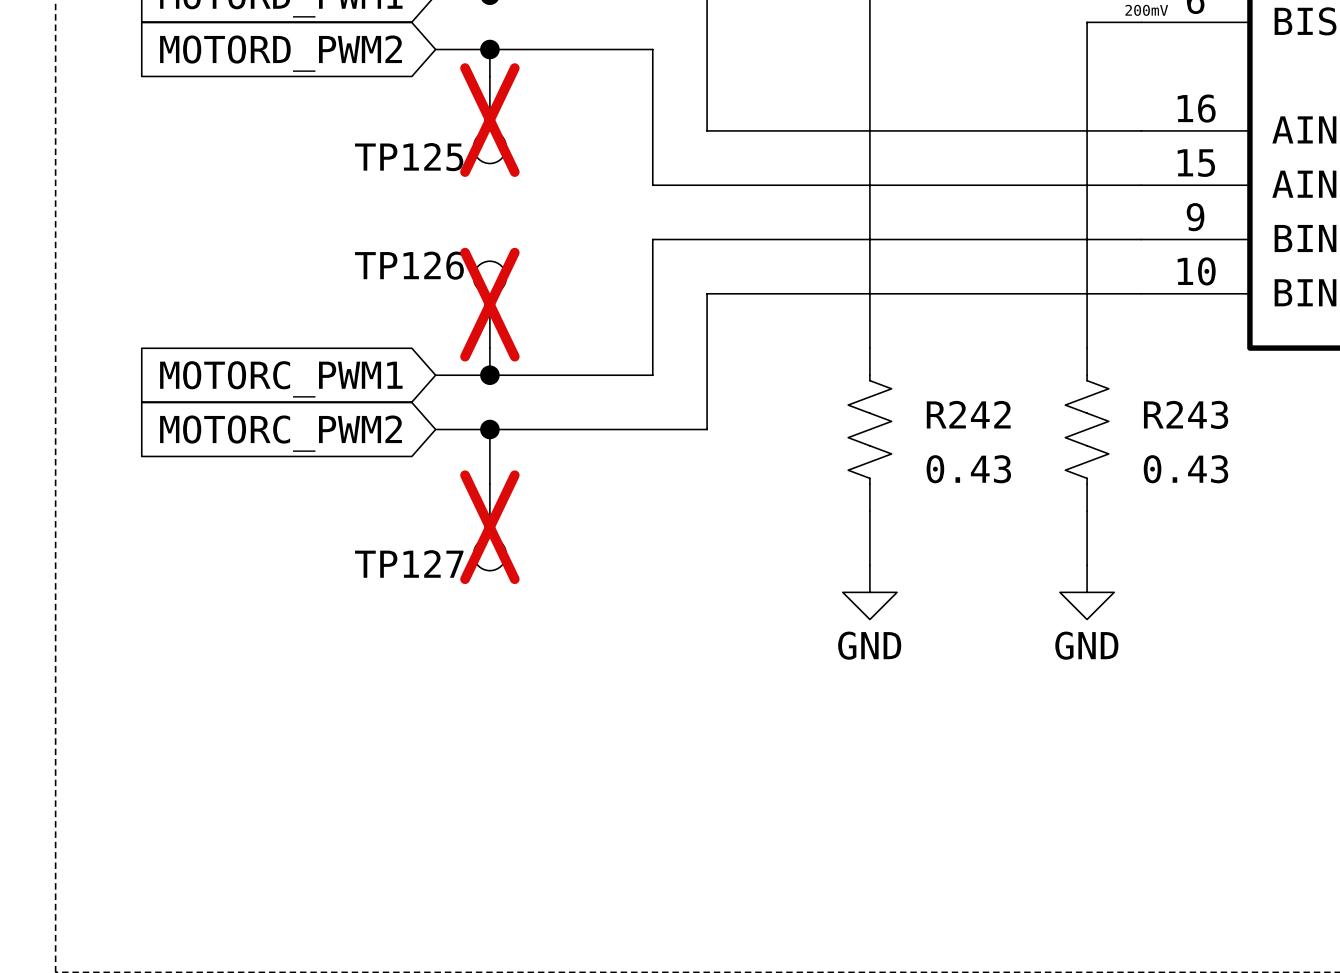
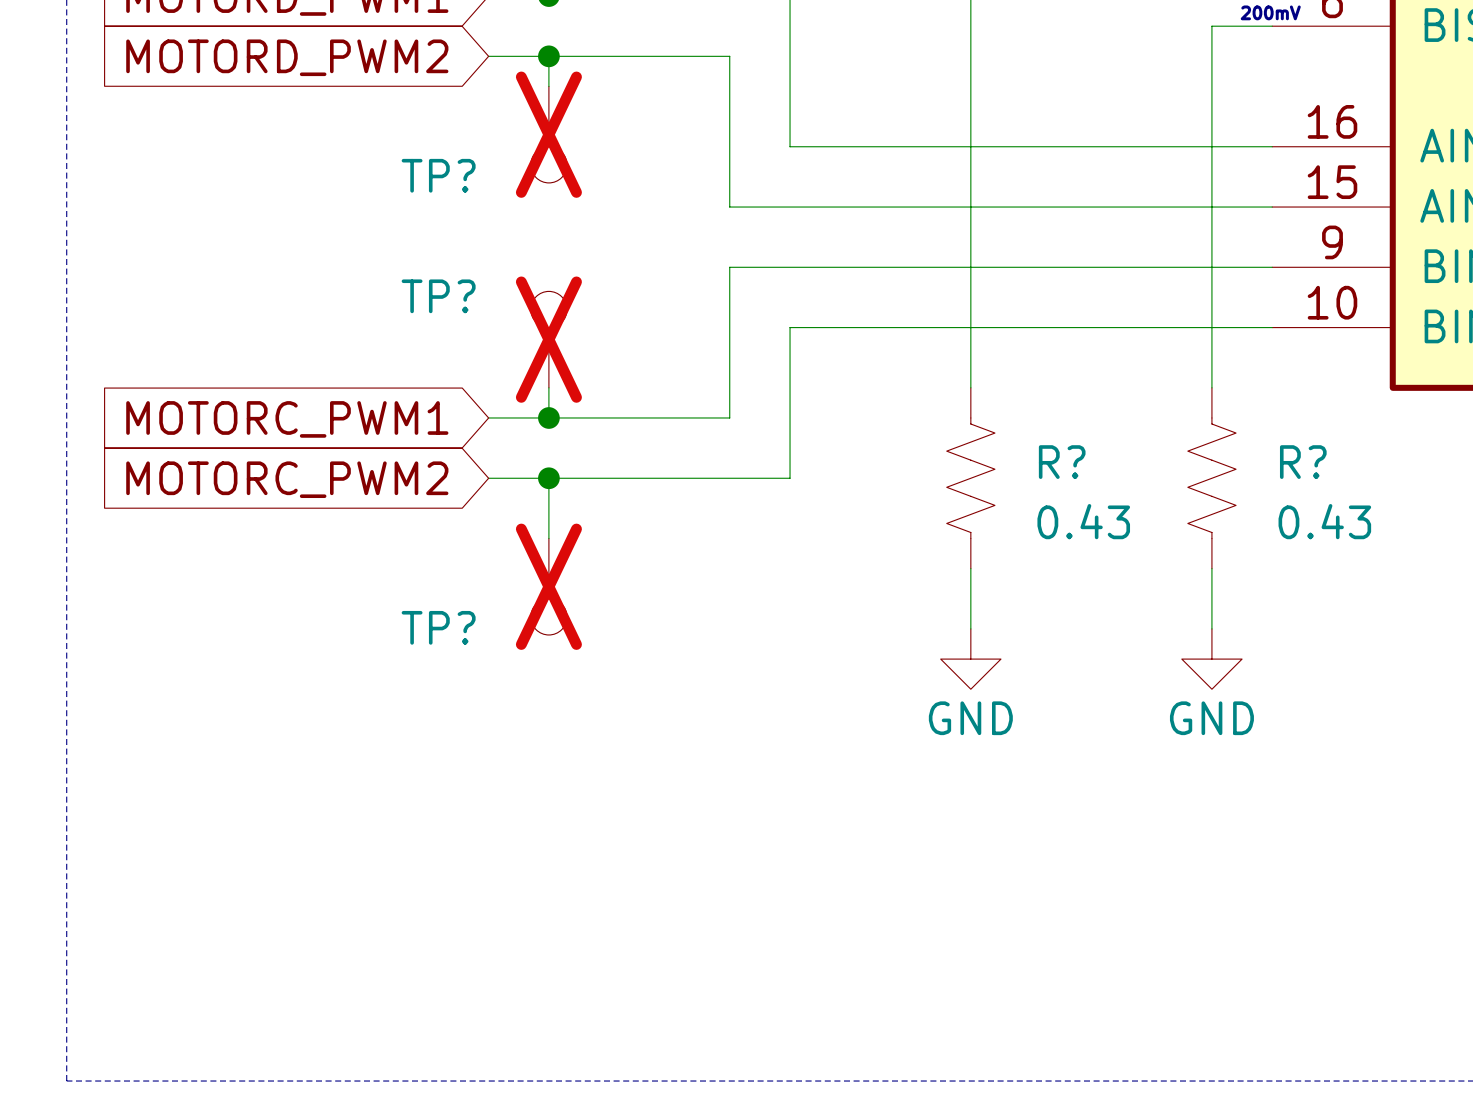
TP125 name: TP125 (409, 157) -> TP? (438, 175)
TP126 name: TP126 (409, 265) -> TP? (438, 296)
R242 name: R242 (968, 414) -> R? (1062, 462)
R243 name: R243 (1186, 414) -> R? (1303, 462)
TP127 name: TP127 (409, 563) -> TP? (438, 627)

